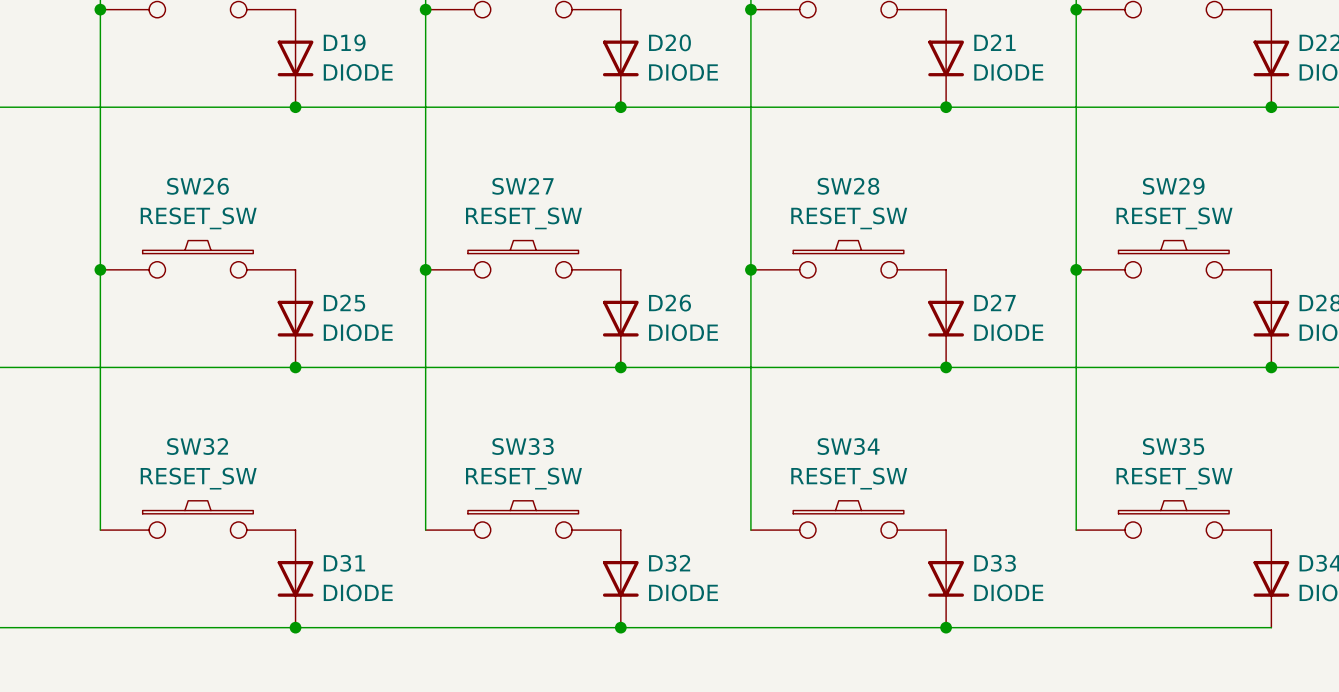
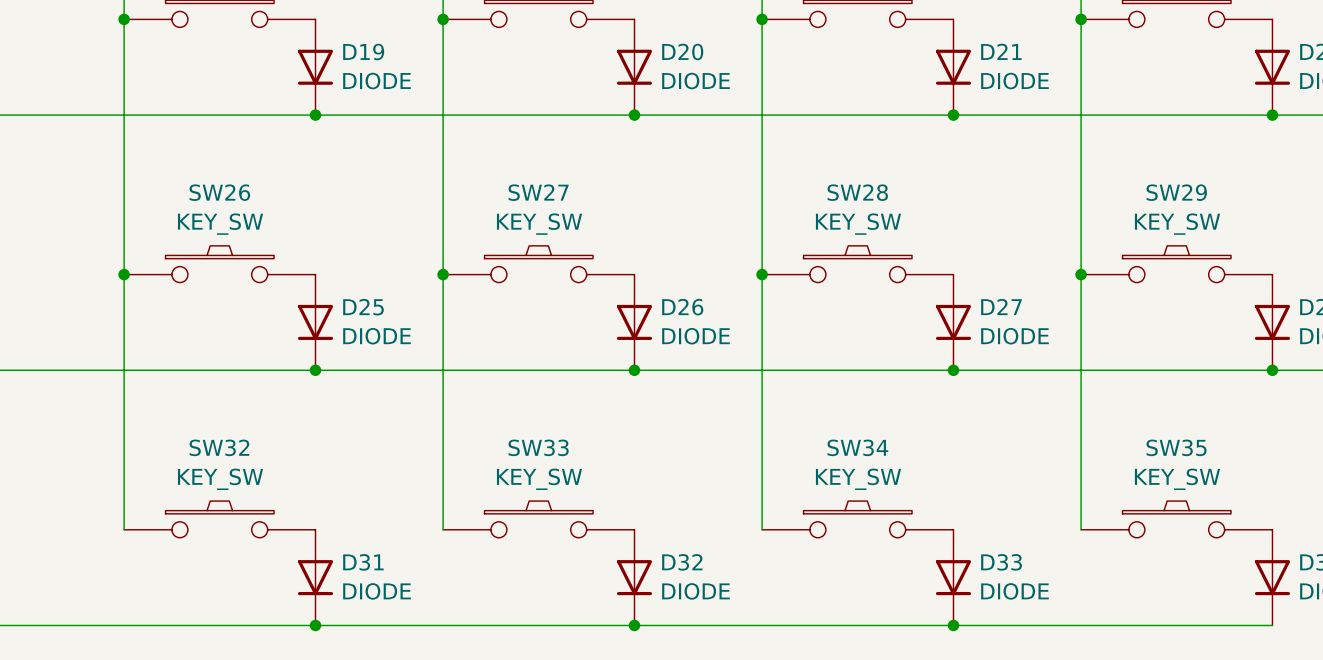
SW26 value: RESET_SW (198, 218) -> KEY_SW (220, 224)
SW27 value: RESET_SW (523, 218) -> KEY_SW (539, 224)
SW28 value: RESET_SW (849, 218) -> KEY_SW (858, 224)
SW29 value: RESET_SW (1174, 218) -> KEY_SW (1177, 224)
SW32 value: RESET_SW (198, 478) -> KEY_SW (220, 479)
SW33 value: RESET_SW (523, 478) -> KEY_SW (539, 479)
SW34 value: RESET_SW (849, 478) -> KEY_SW (858, 479)
SW35 value: RESET_SW (1174, 478) -> KEY_SW (1177, 479)

